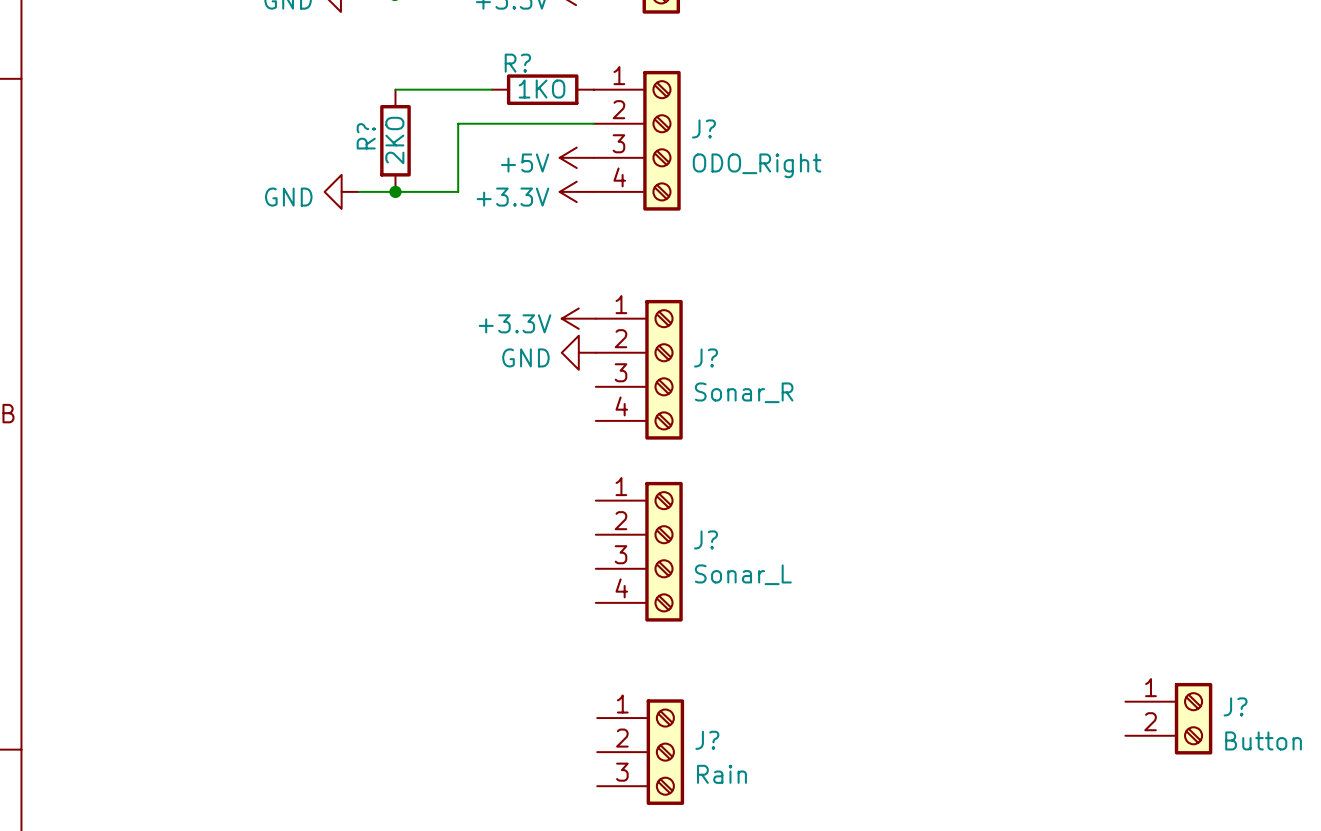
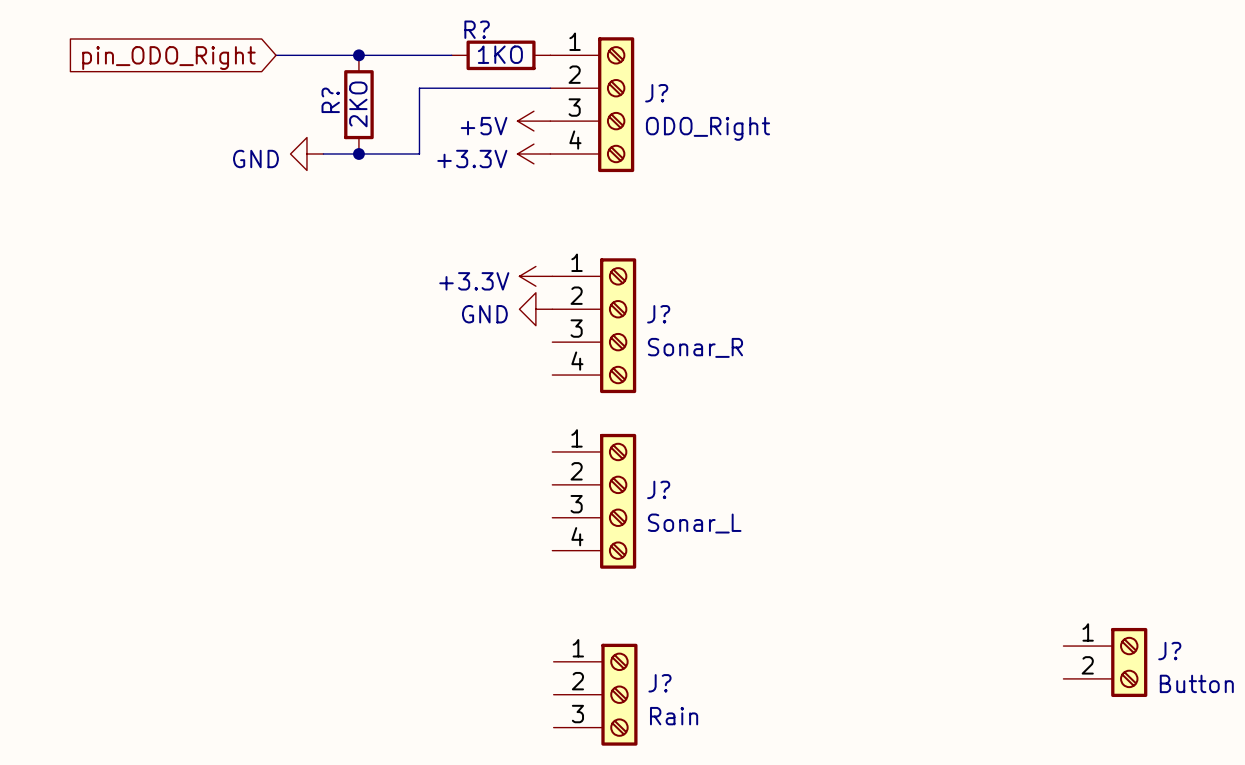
wire: none -> (275, 55) (358, 55)
junction: none -> (358, 55)
global label: none -> pin_ODO_Right (168, 58)

